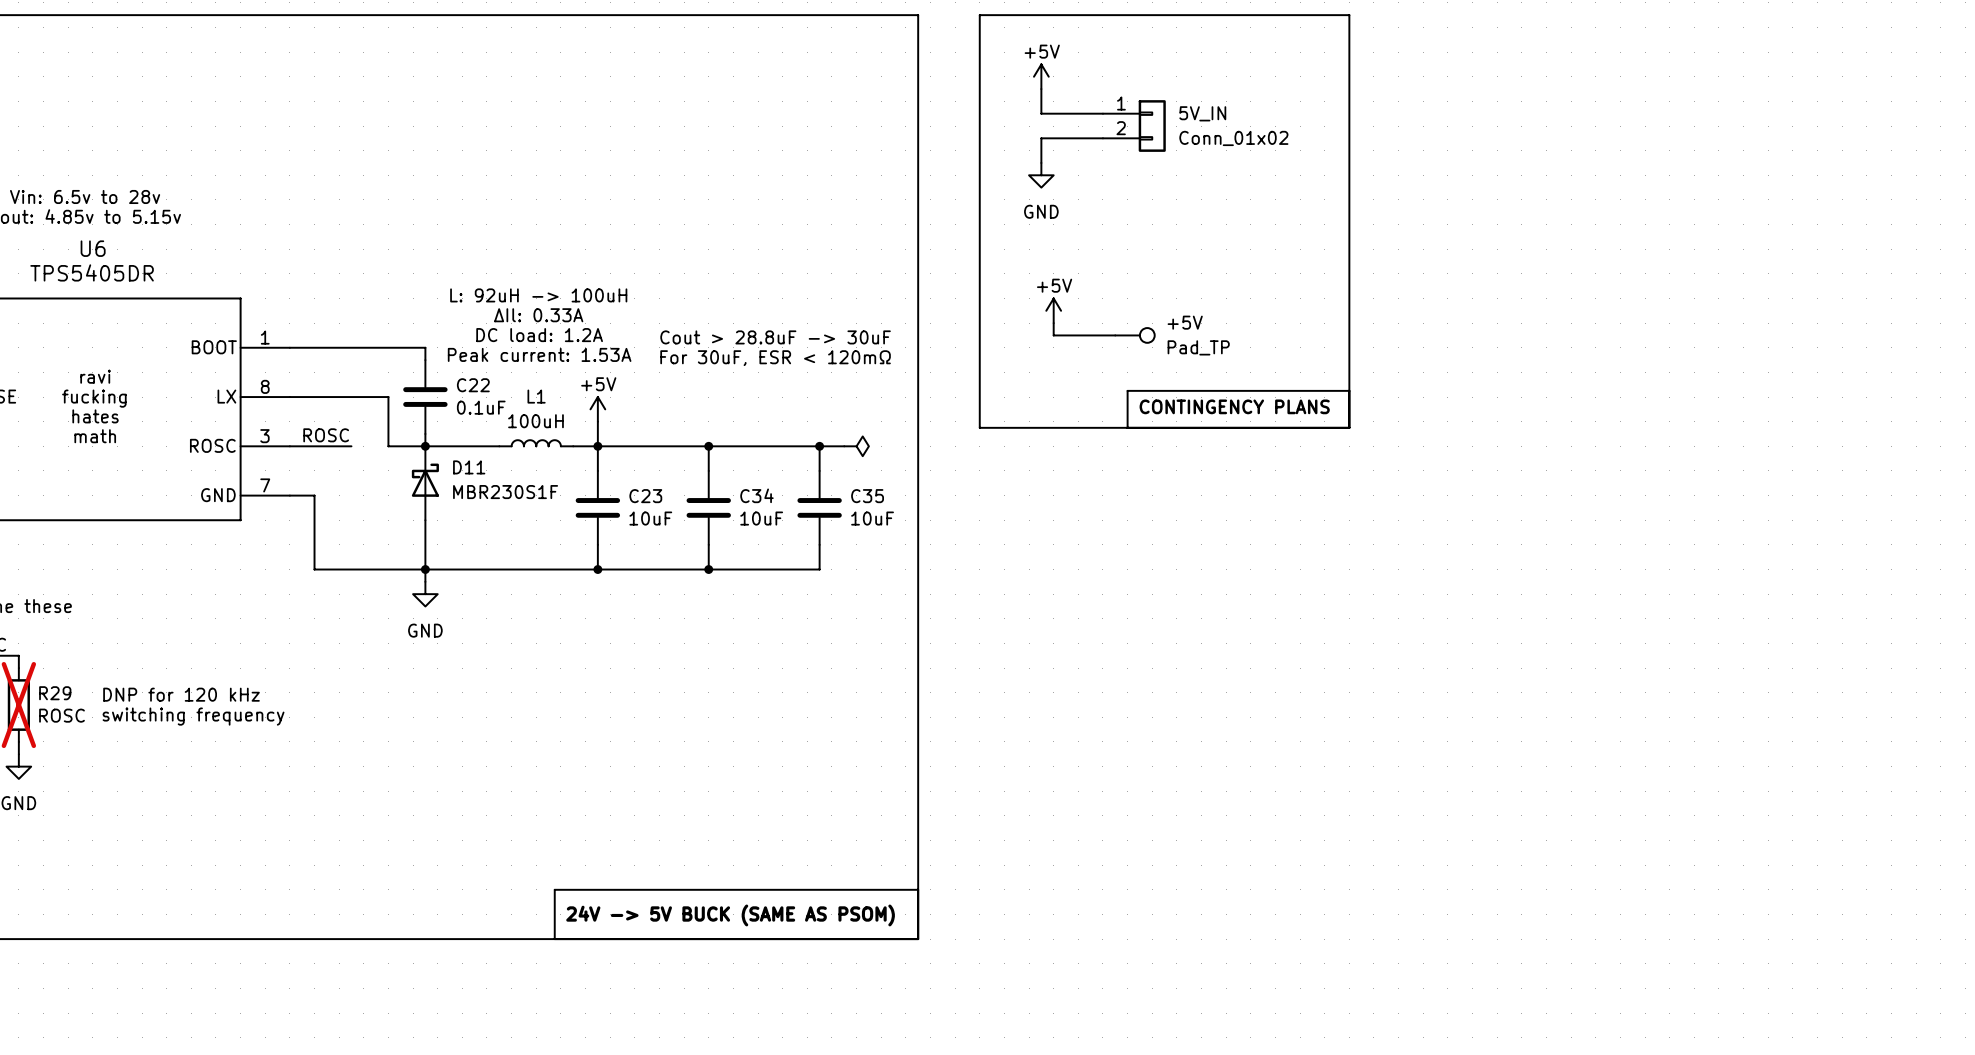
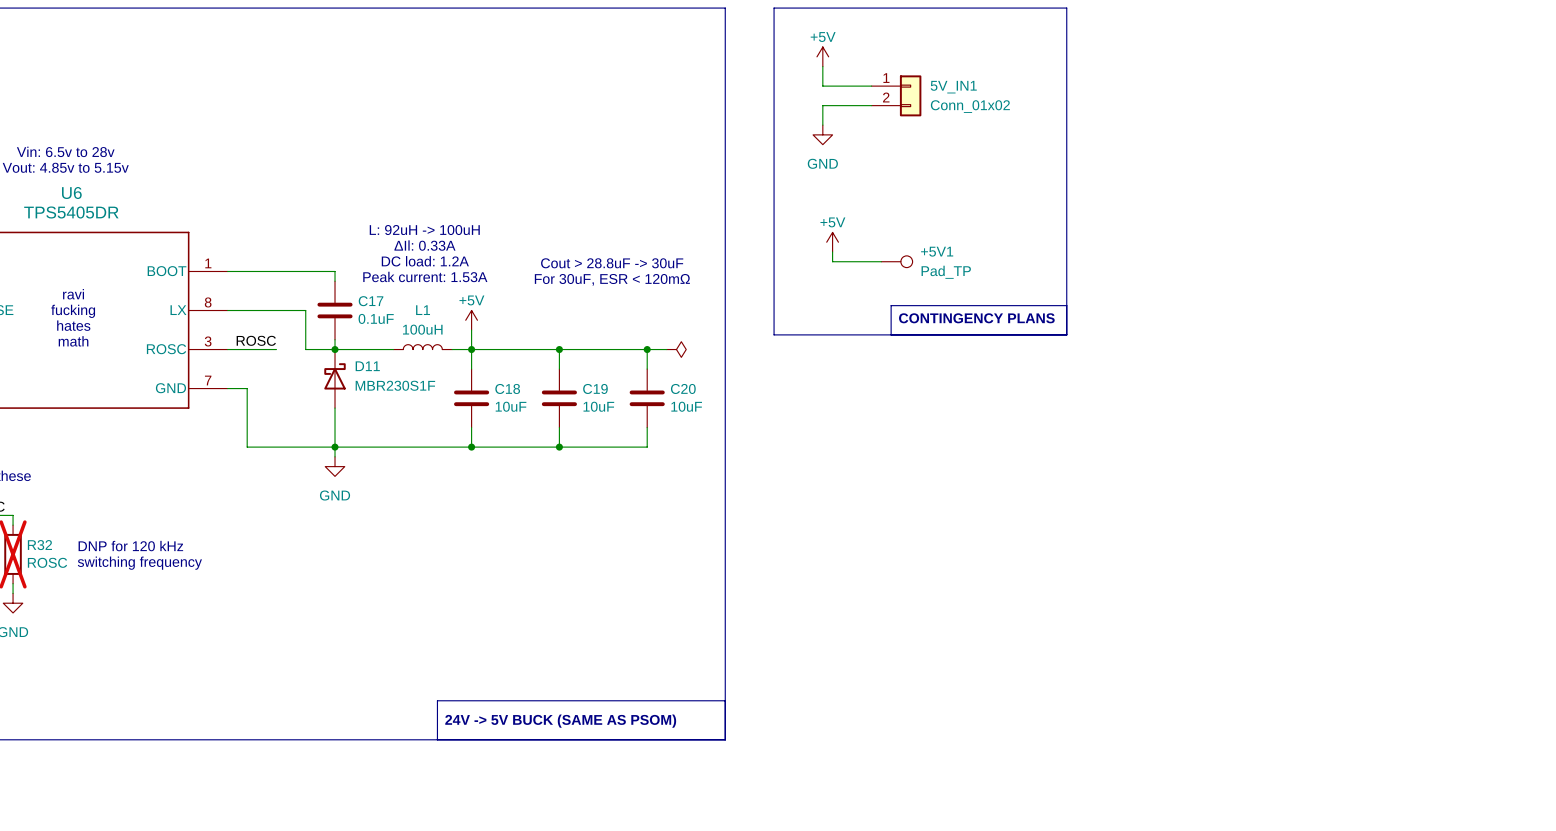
5V_IN name: 5V_IN (1202, 113) -> 5V_IN1 (953, 87)
+5V name: +5V (1185, 322) -> +5V1 (937, 251)
C22 name: C22 (473, 385) -> C17 (371, 301)
C34 name: C34 (756, 495) -> C19 (595, 388)
C23 name: C23 (645, 496) -> C18 (507, 388)
C35 name: C35 (867, 496) -> C20 (683, 388)
R29 name: R29 (55, 693) -> R32 (39, 545)

